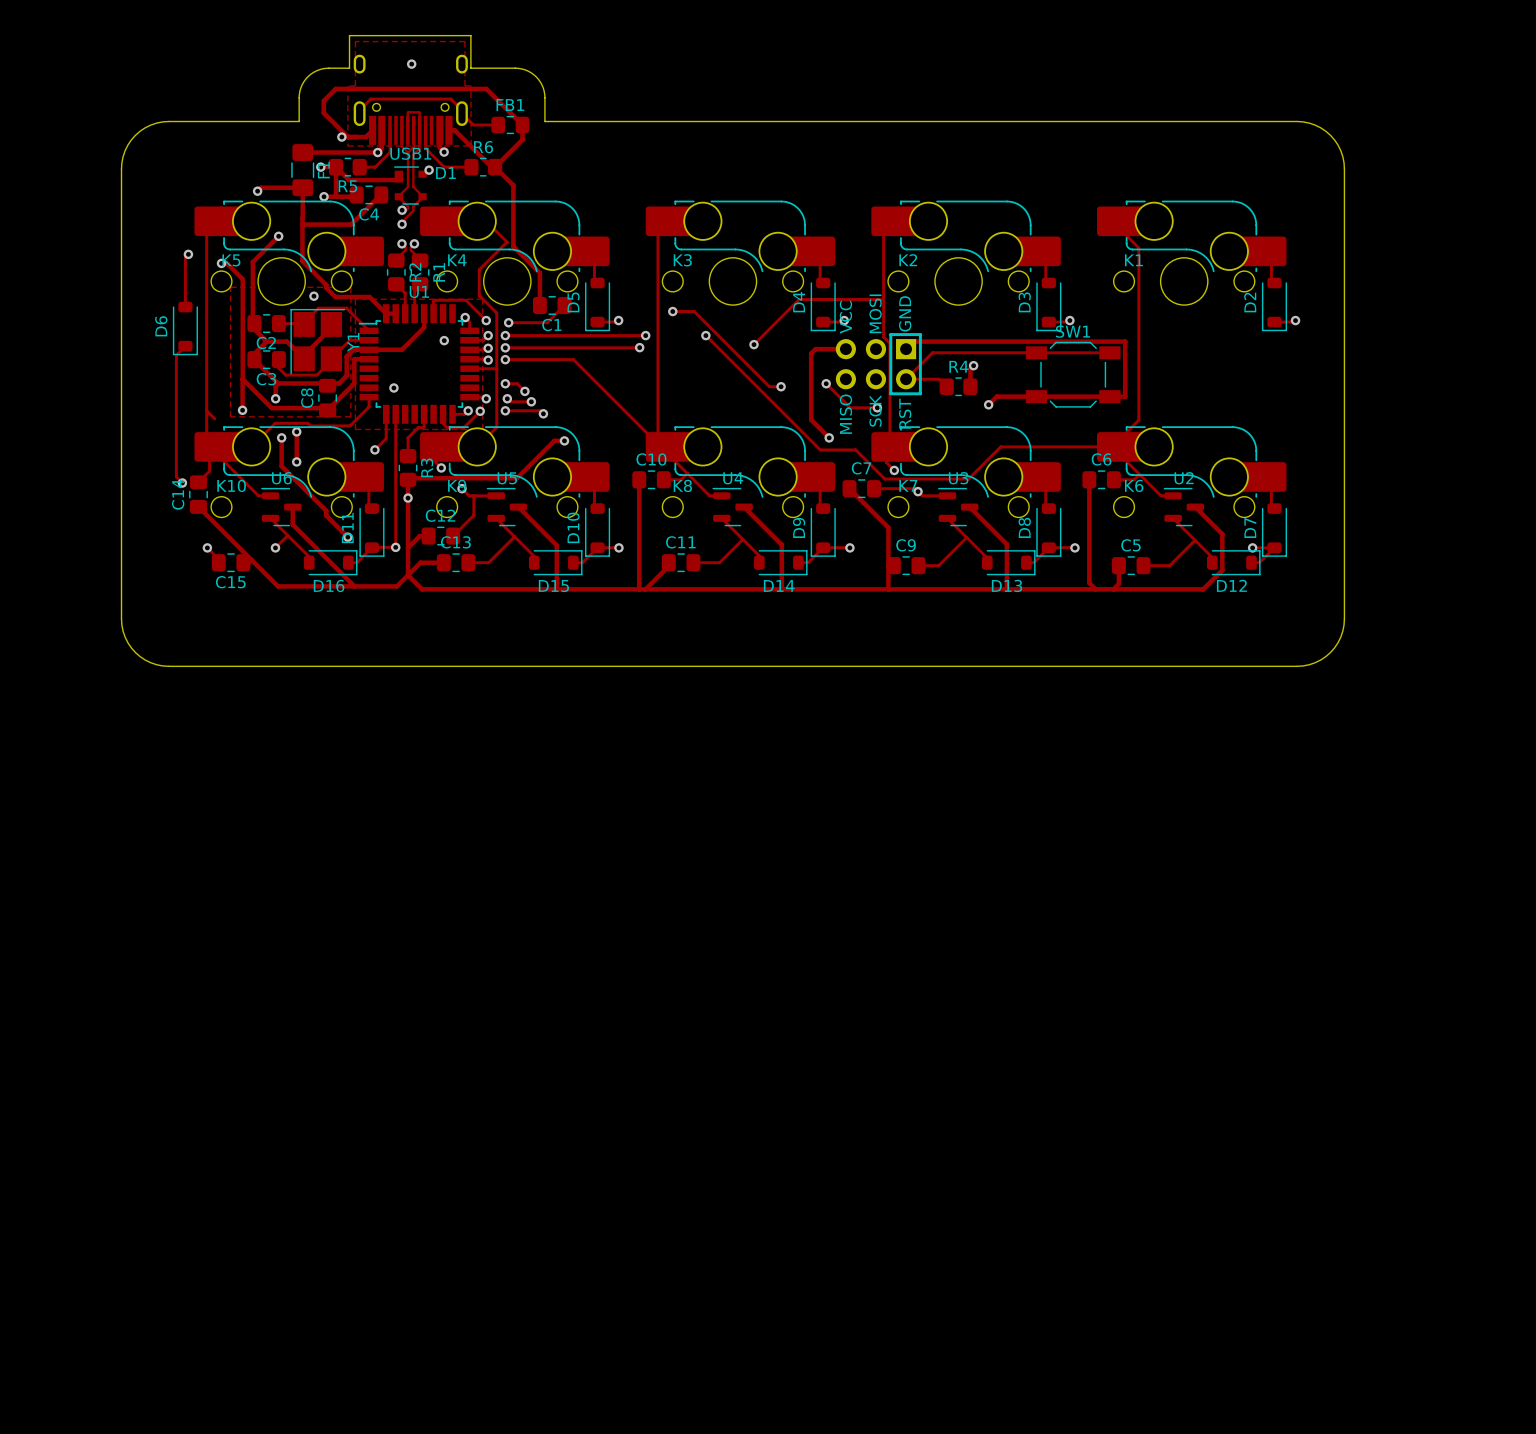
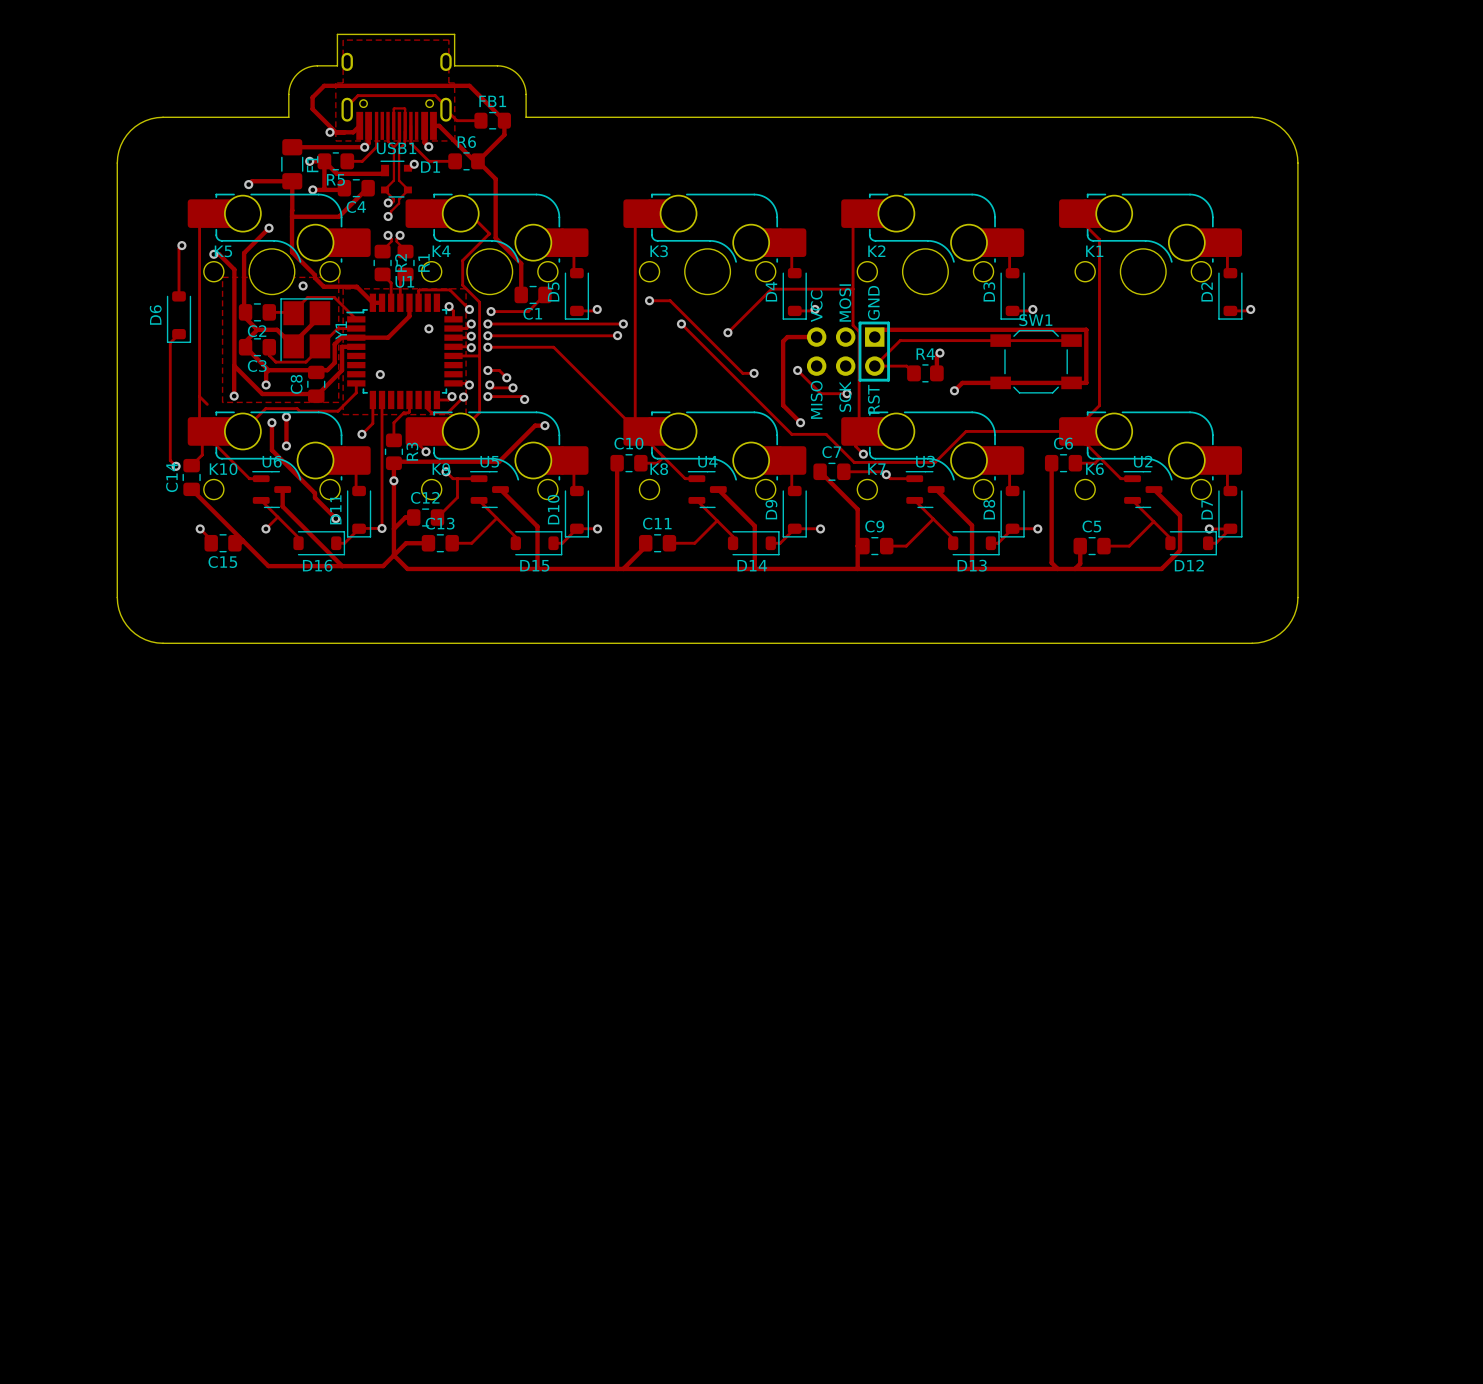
via: (411, 64) -> none

